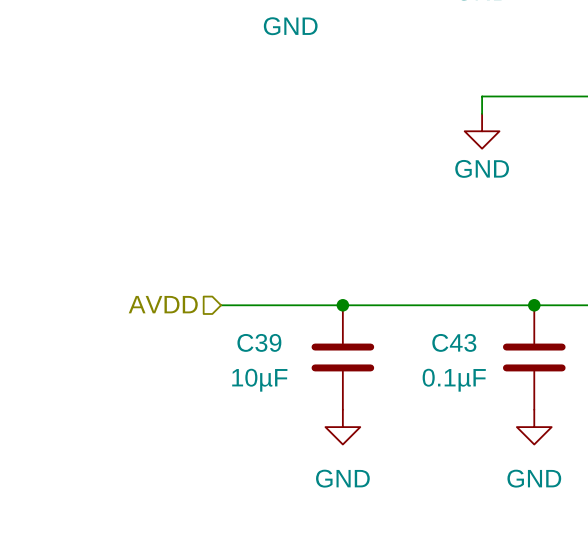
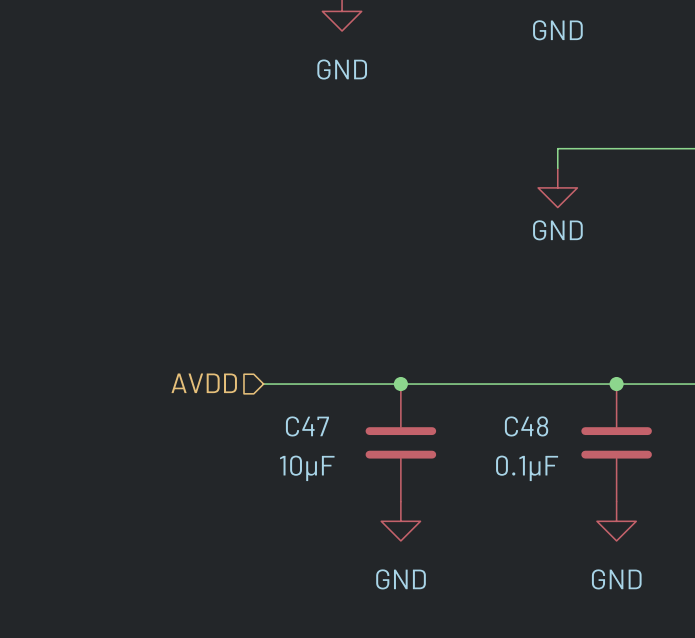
C39 name: C39 (259, 342) -> C47 (307, 426)
C43 name: C43 (454, 342) -> C48 (526, 426)

